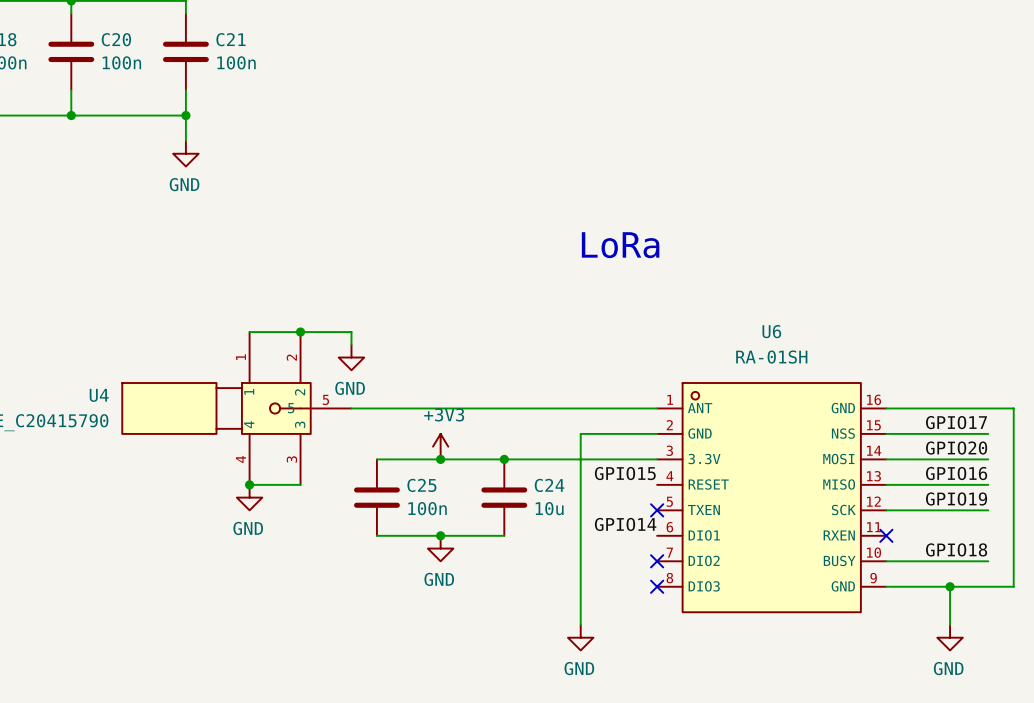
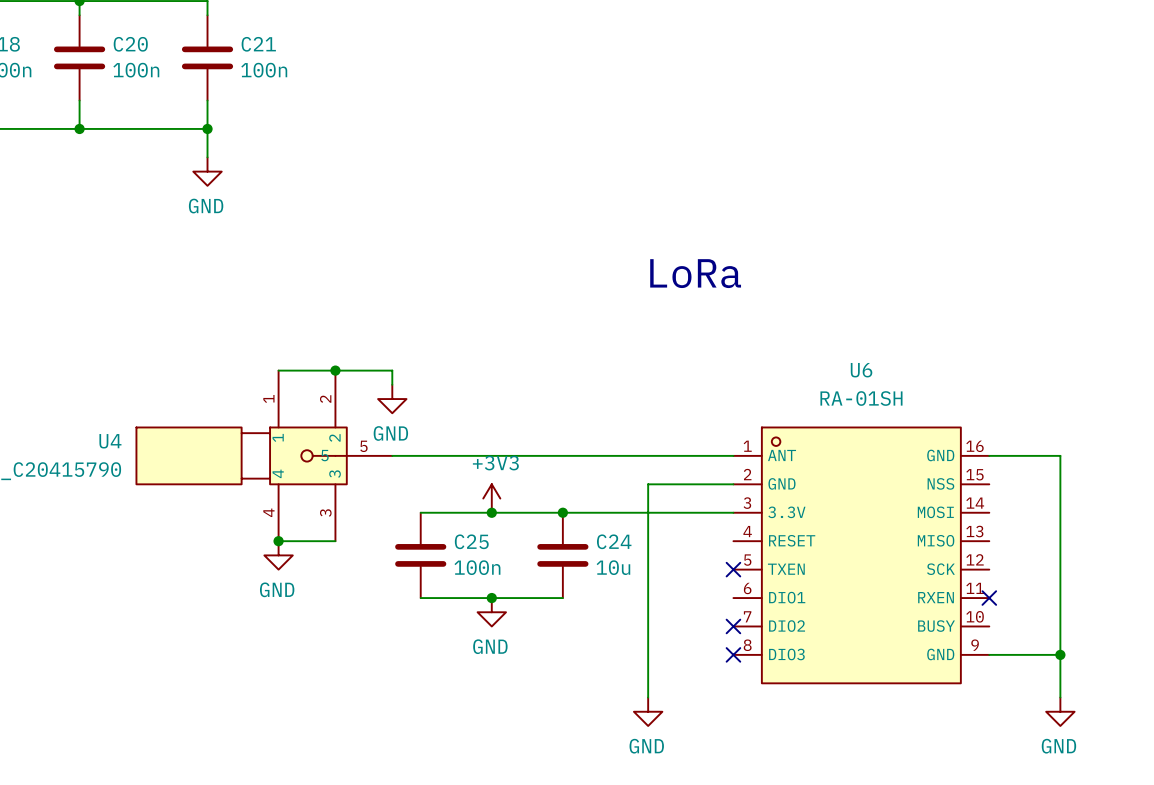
wire: (950, 408) (1013, 408) (1013, 586) (950, 586) -> (1060, 455) (1060, 654)
label: GPIO17 (956, 422) -> none
wire: (886, 433) (988, 433) -> none
label: GPIO20 (956, 448) -> none
wire: (886, 459) (988, 459) -> none
label: GPIO15 (625, 473) -> none
label: GPIO16 (956, 473) -> none
wire: (886, 484) (988, 484) -> none
label: GPIO19 (956, 498) -> none
wire: (886, 510) (988, 510) -> none
label: GPIO14 (625, 524) -> none
label: GPIO18 (956, 549) -> none
wire: (886, 561) (988, 561) -> none

